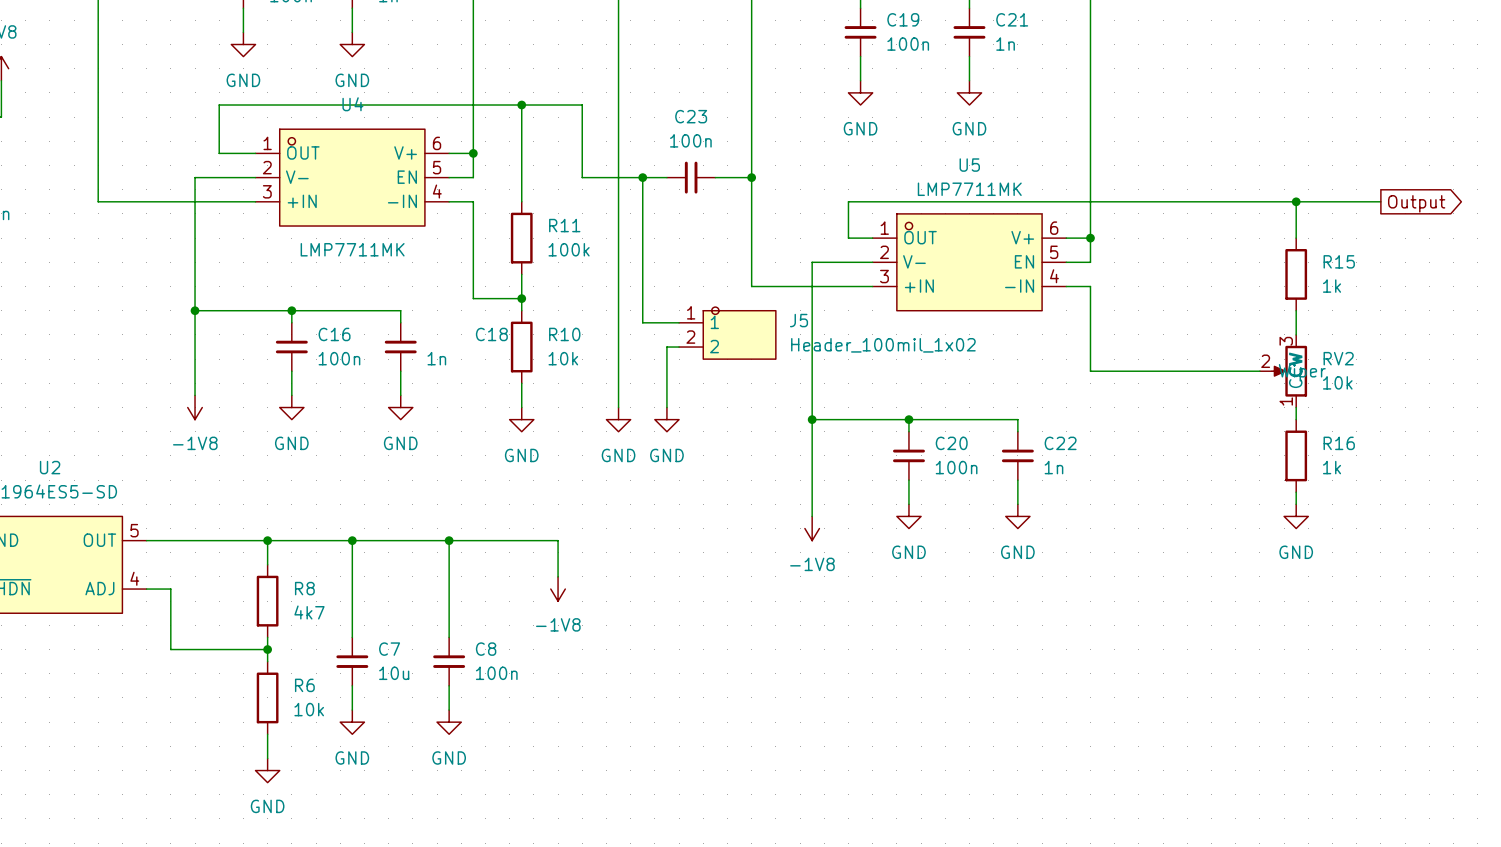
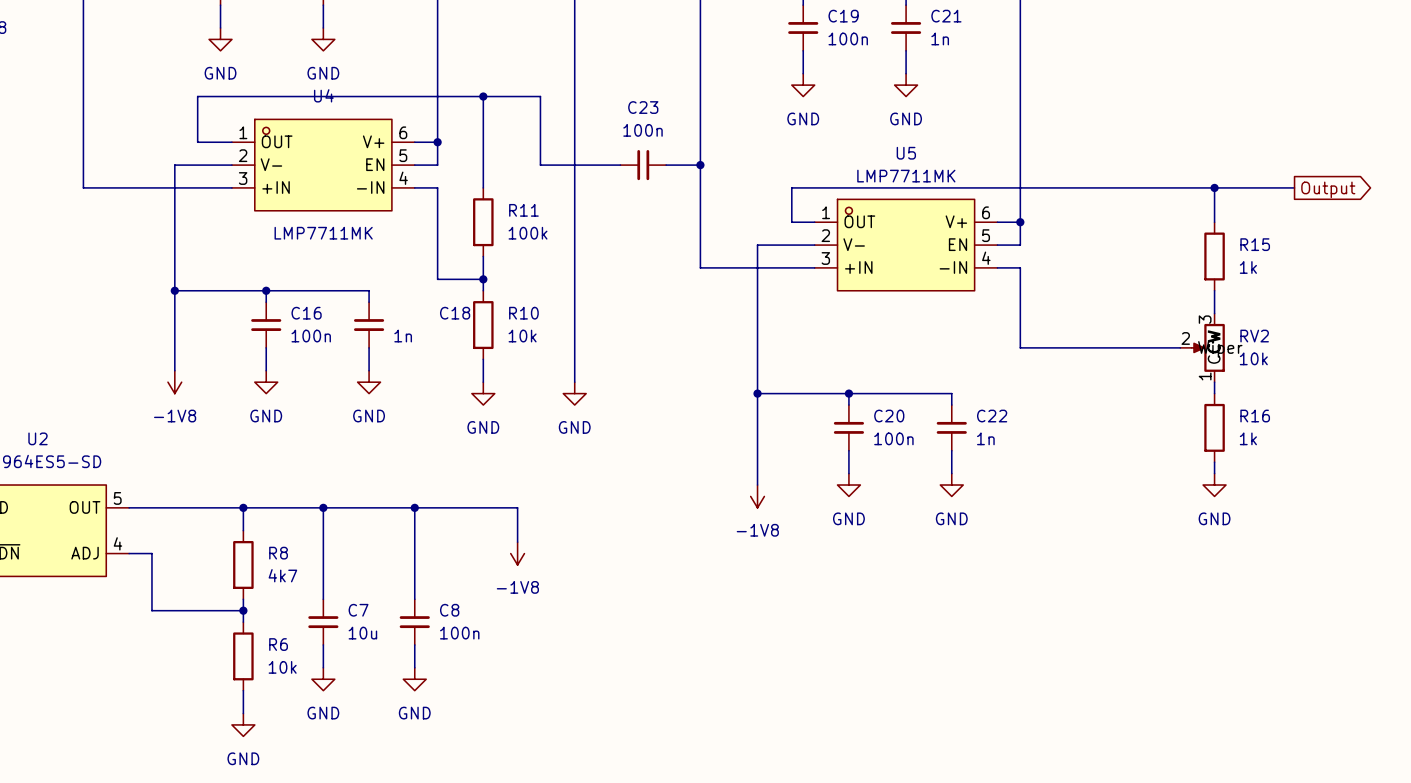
wire: (642, 177) (642, 322) (679, 322) -> none
junction: (642, 177) -> none
J5: Header_100mil_1x02 (727, 333) -> none
wire: (679, 347) (666, 347) (666, 407) -> none
power symbol: GND (666, 419) -> none

